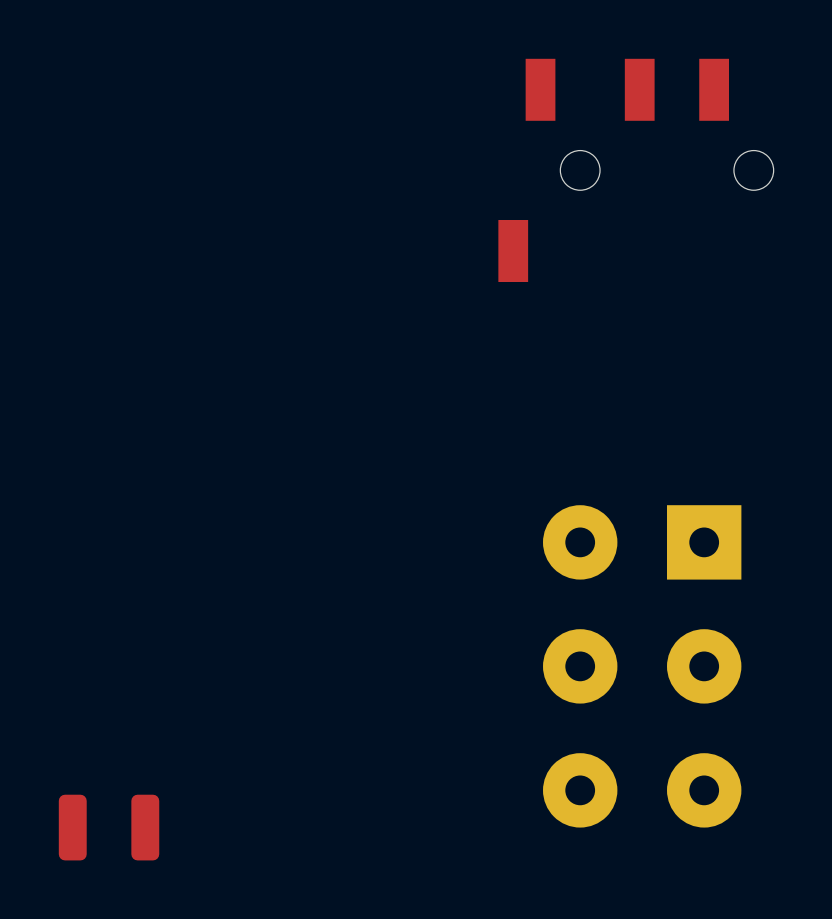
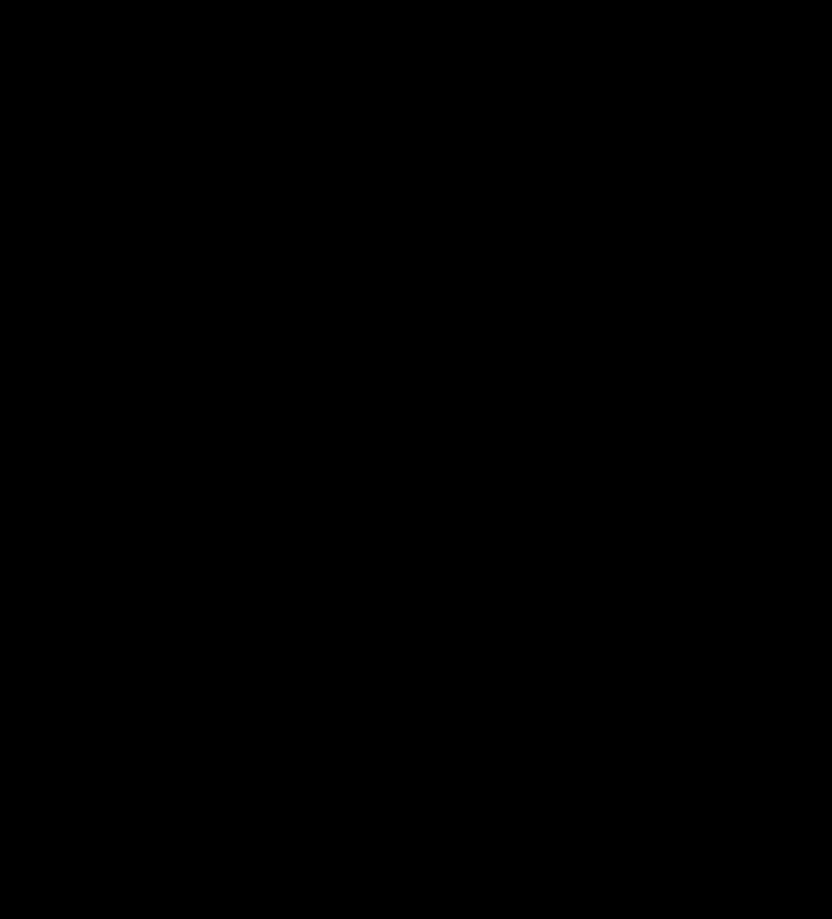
part: (636, 170) -> none
part: (642, 666) -> none
part: (109, 827) -> none

